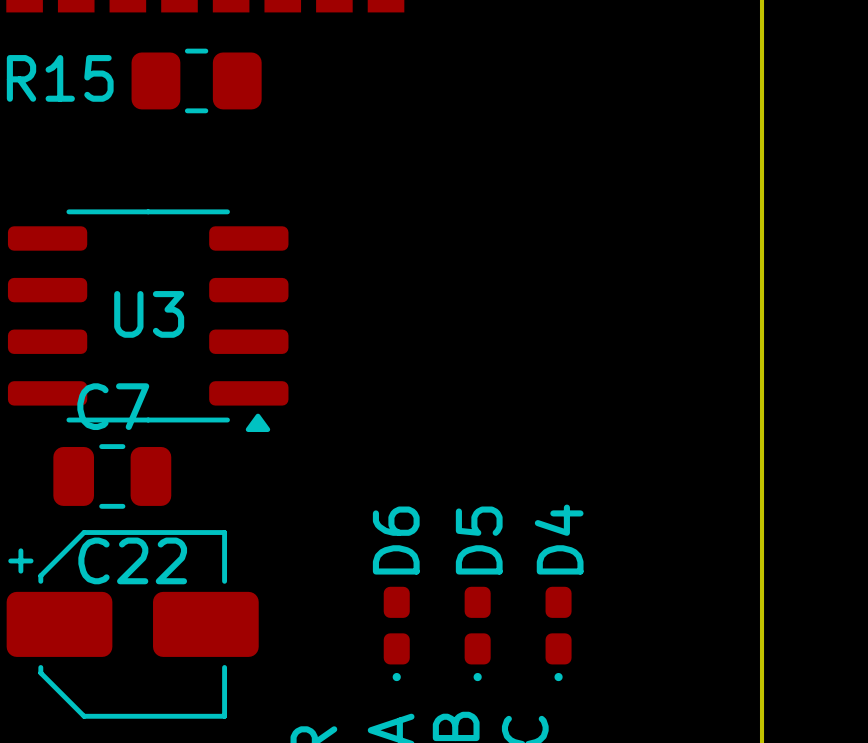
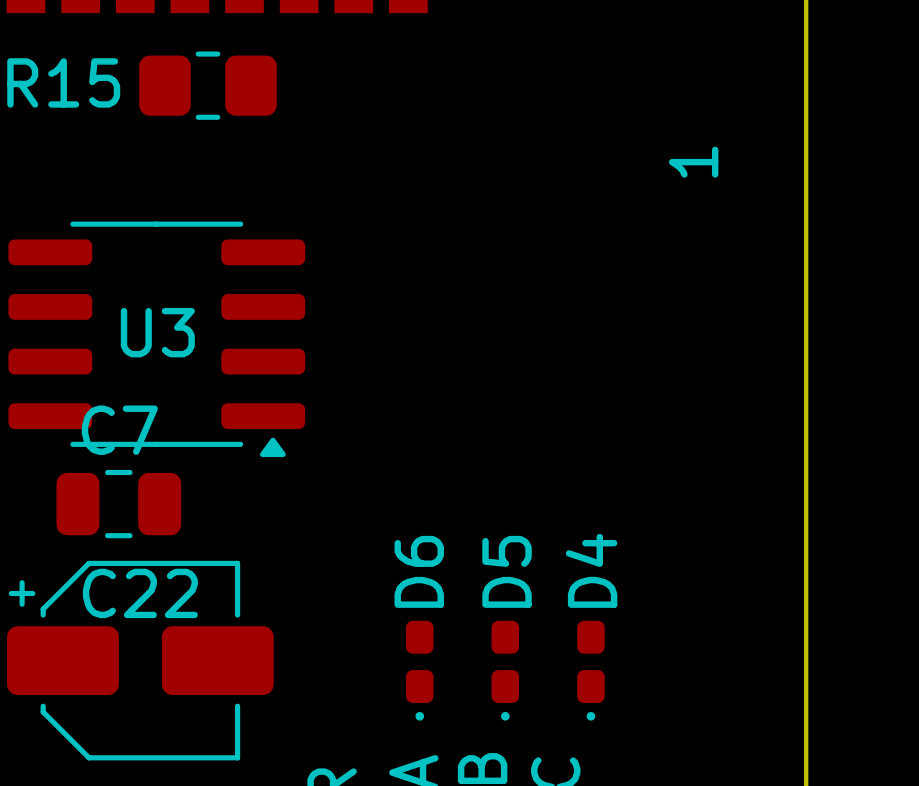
text: none -> 1 (693, 162)

